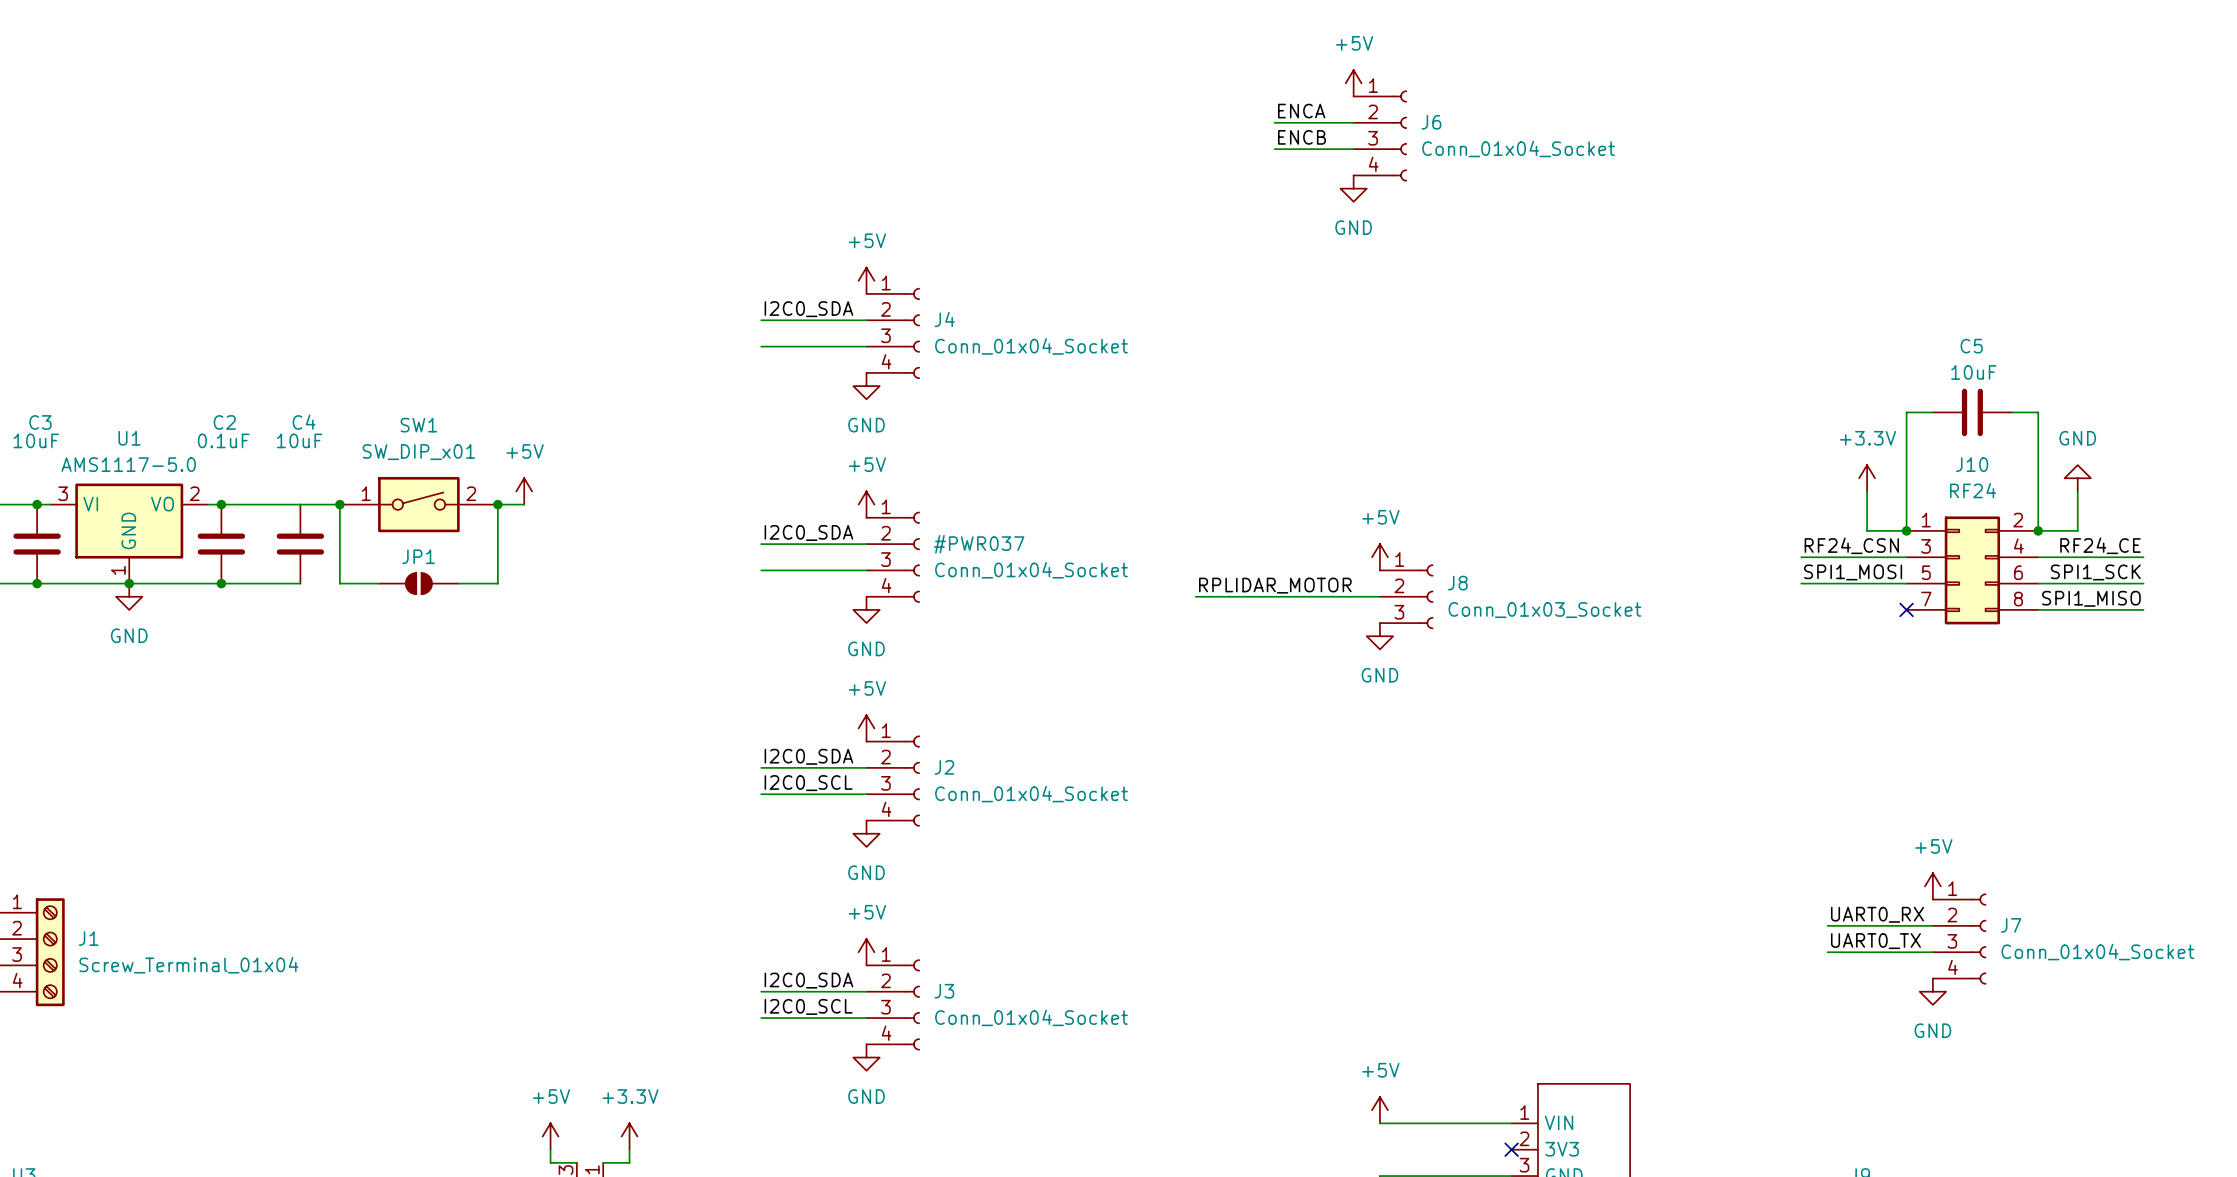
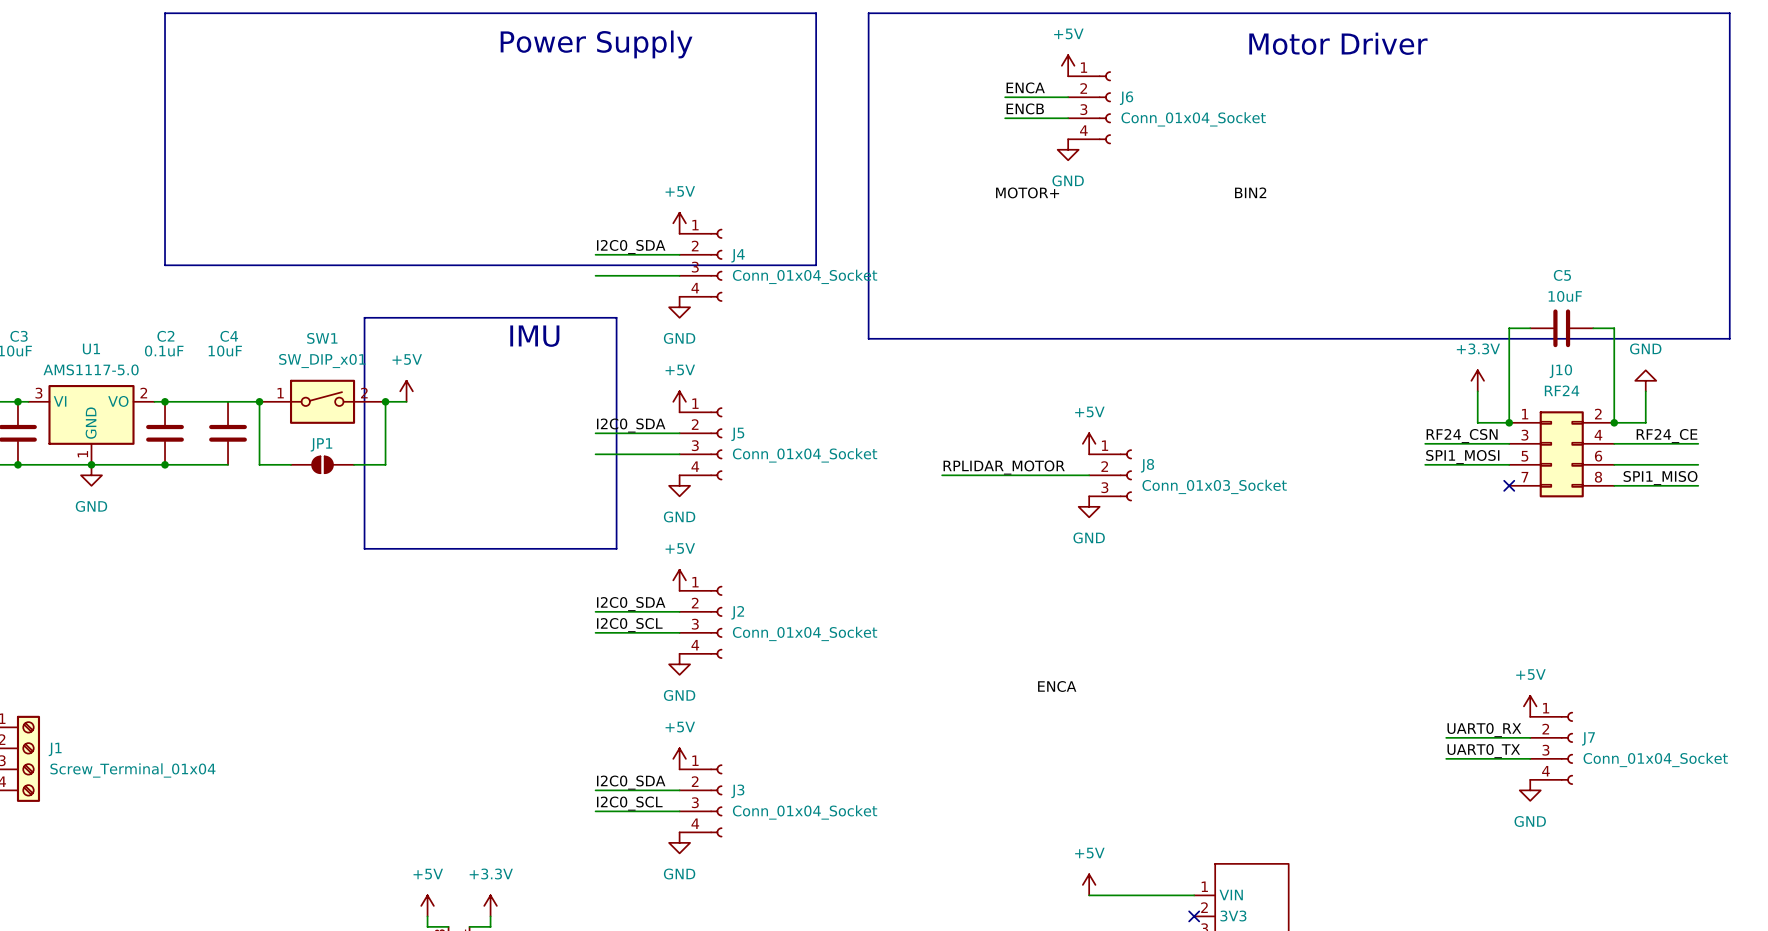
line: none -> (165, 13) (816, 13) (816, 265) (165, 265) (165, 13)
line: none -> (868, 13) (1729, 13) (1729, 338) (868, 338) (868, 13)
text: none -> Motor Driver (1338, 43)
text: none -> Power Supply (596, 44)
label: none -> MOTOR+ (1027, 192)
label: none -> BIN2 (1250, 192)
line: none -> (364, 317) (616, 317) (616, 548) (364, 548) (364, 317)
text: none -> IMU (534, 336)
J5: none -> Conn_01x04_Socket (700, 443)
#PWR037: Conn_01x04_Socket (893, 557) -> none
label: SPI1_SCK (2095, 572) -> none
label: none -> ENCA (1057, 686)

